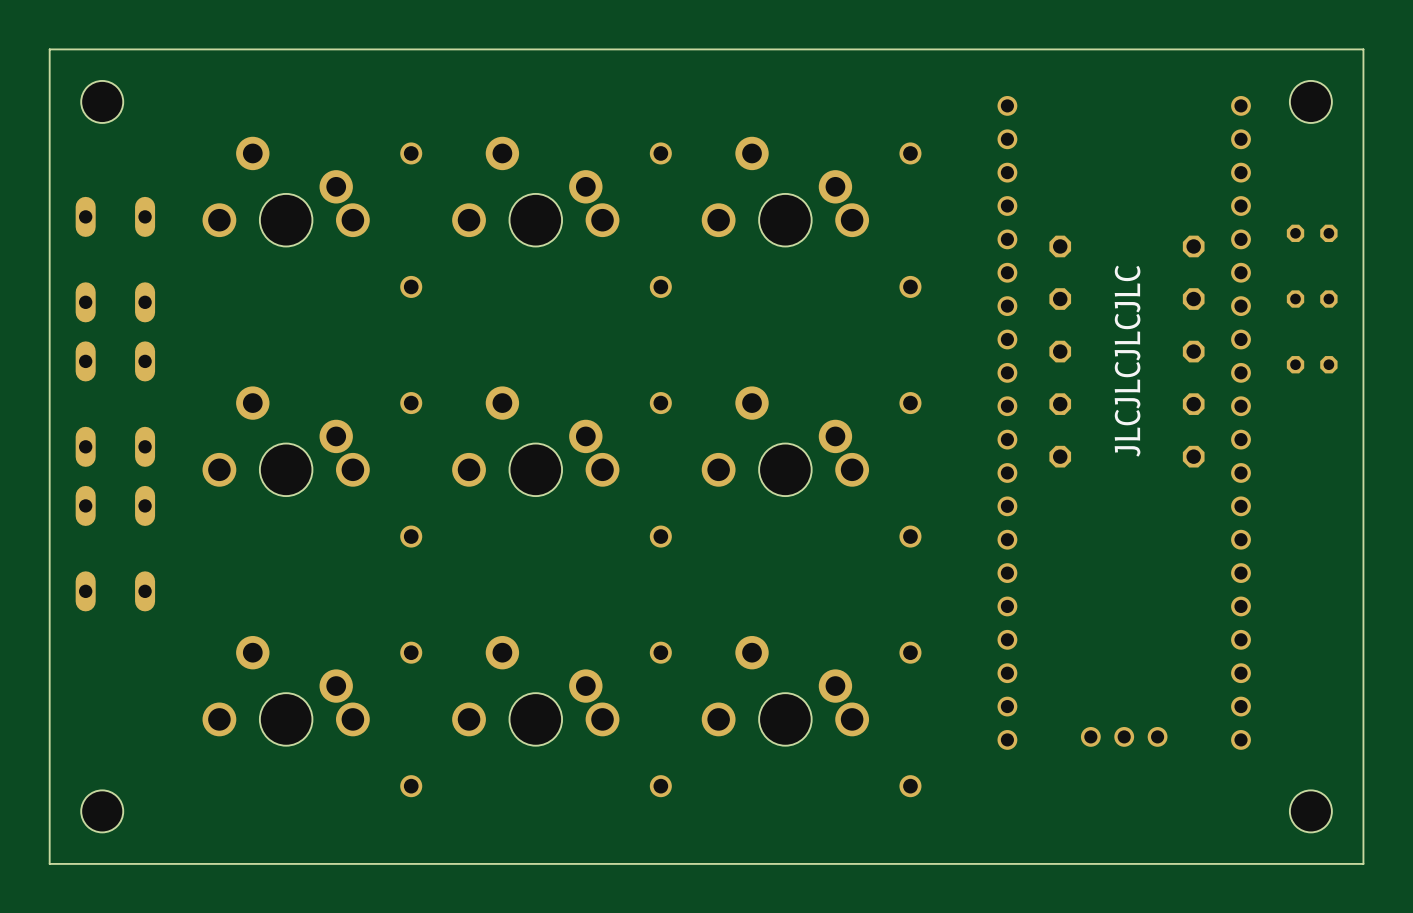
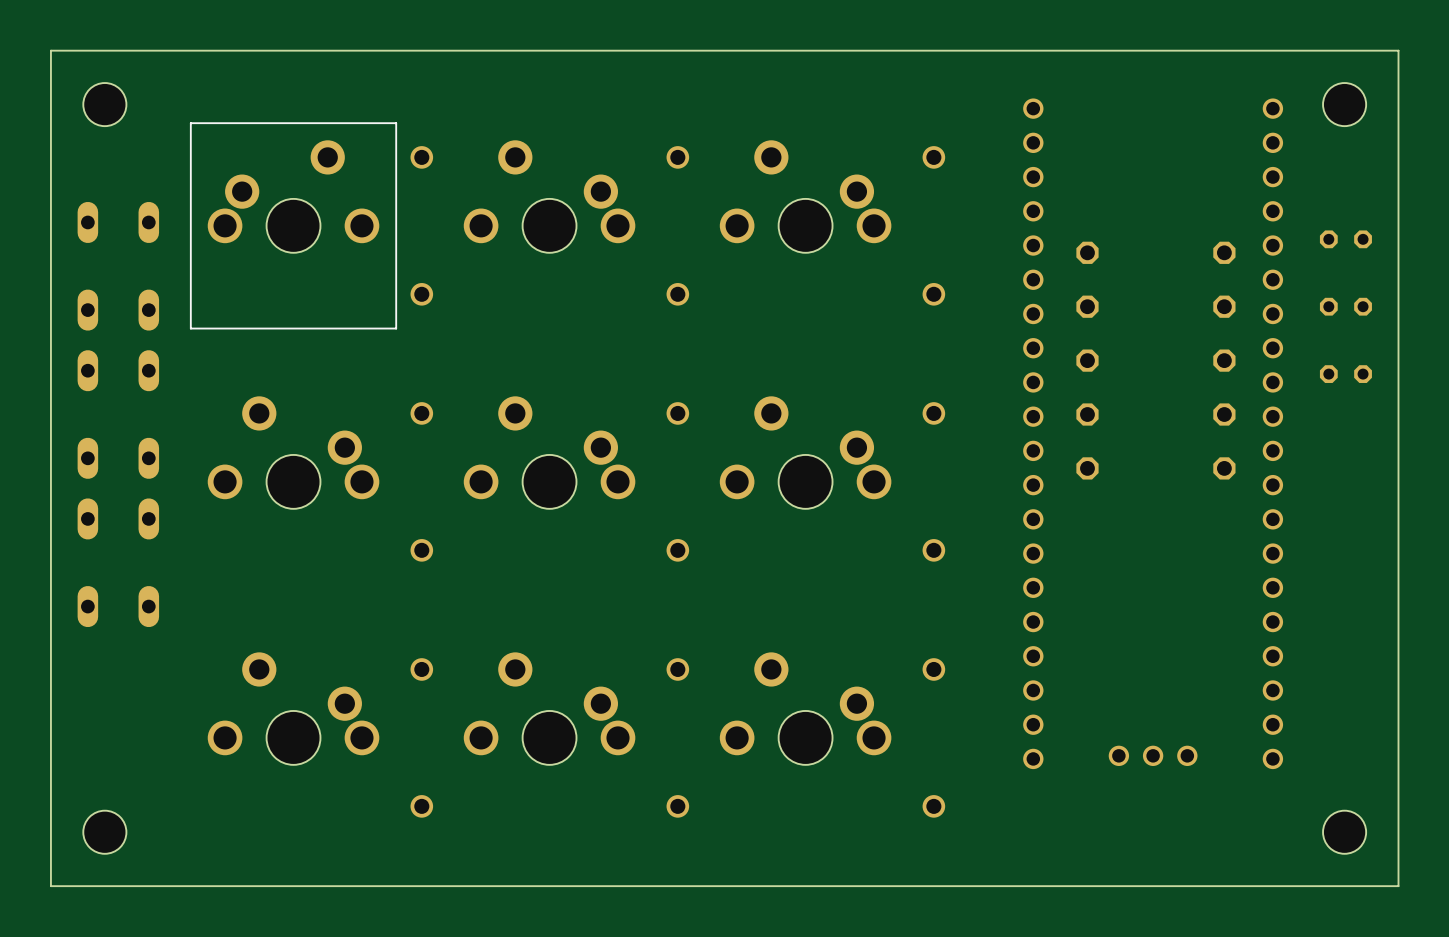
part side: top (286, 191) -> bottom (293, 225)
text: JLCJLCJLCJLC (1127, 361) -> none

